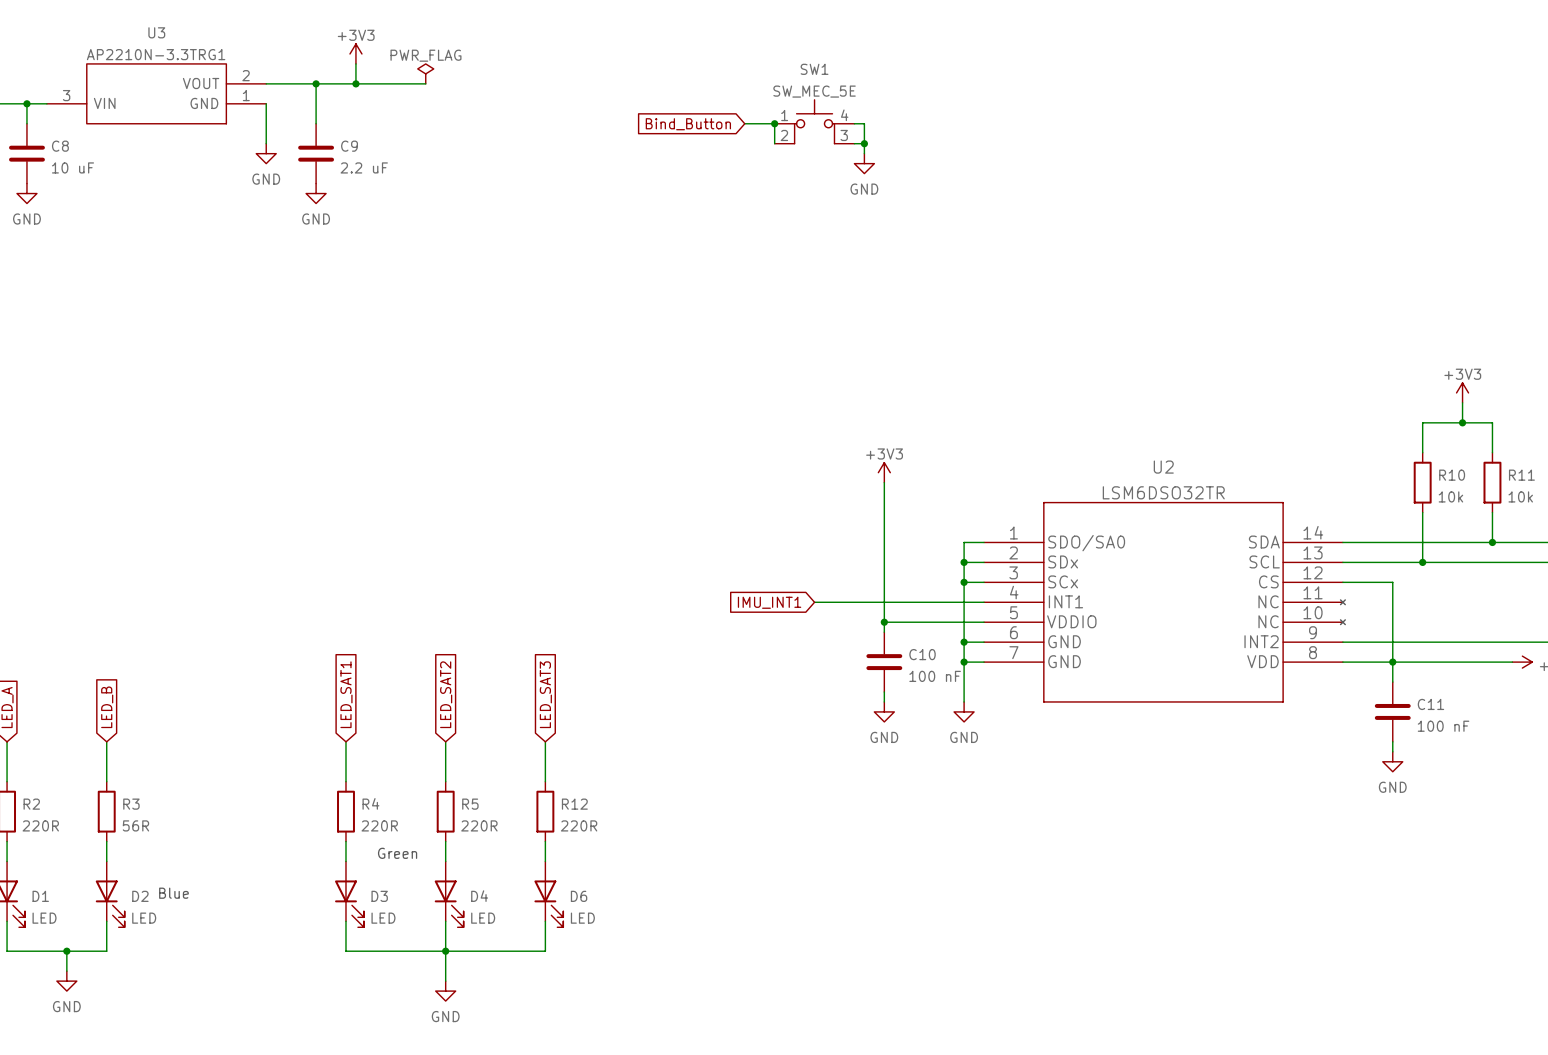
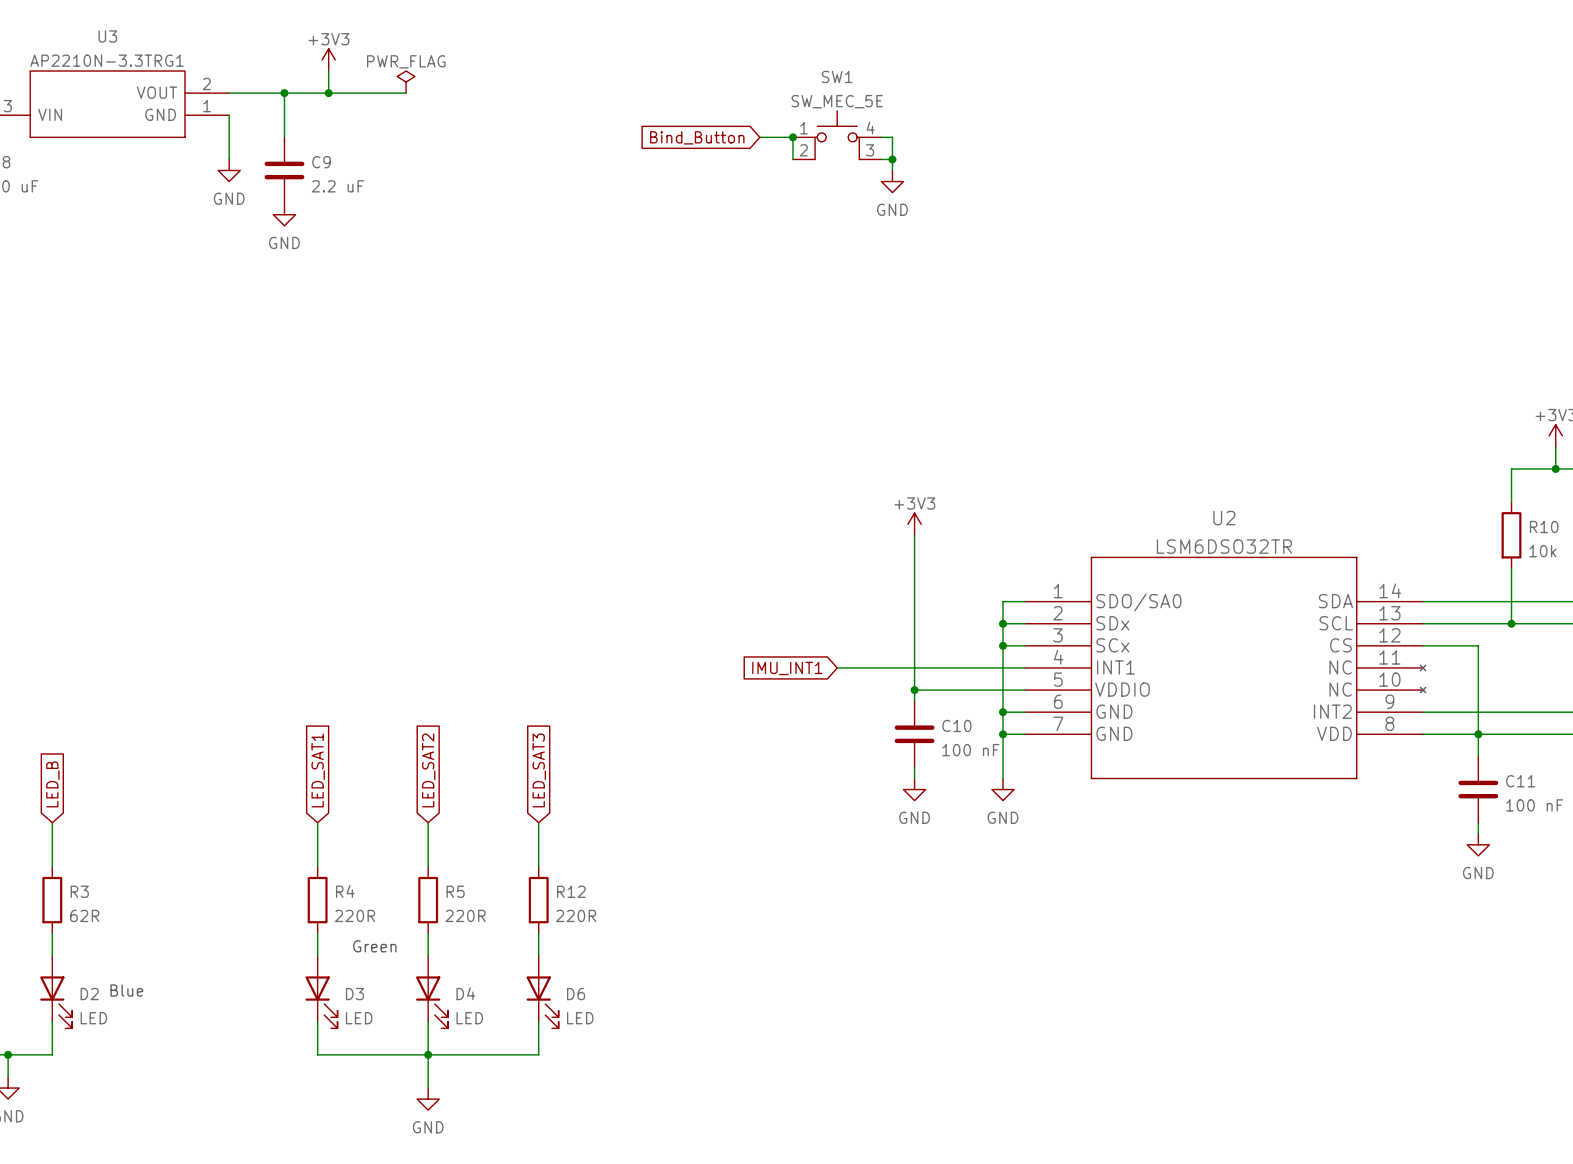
R3 value: 56R (135, 825) -> 62R (84, 915)

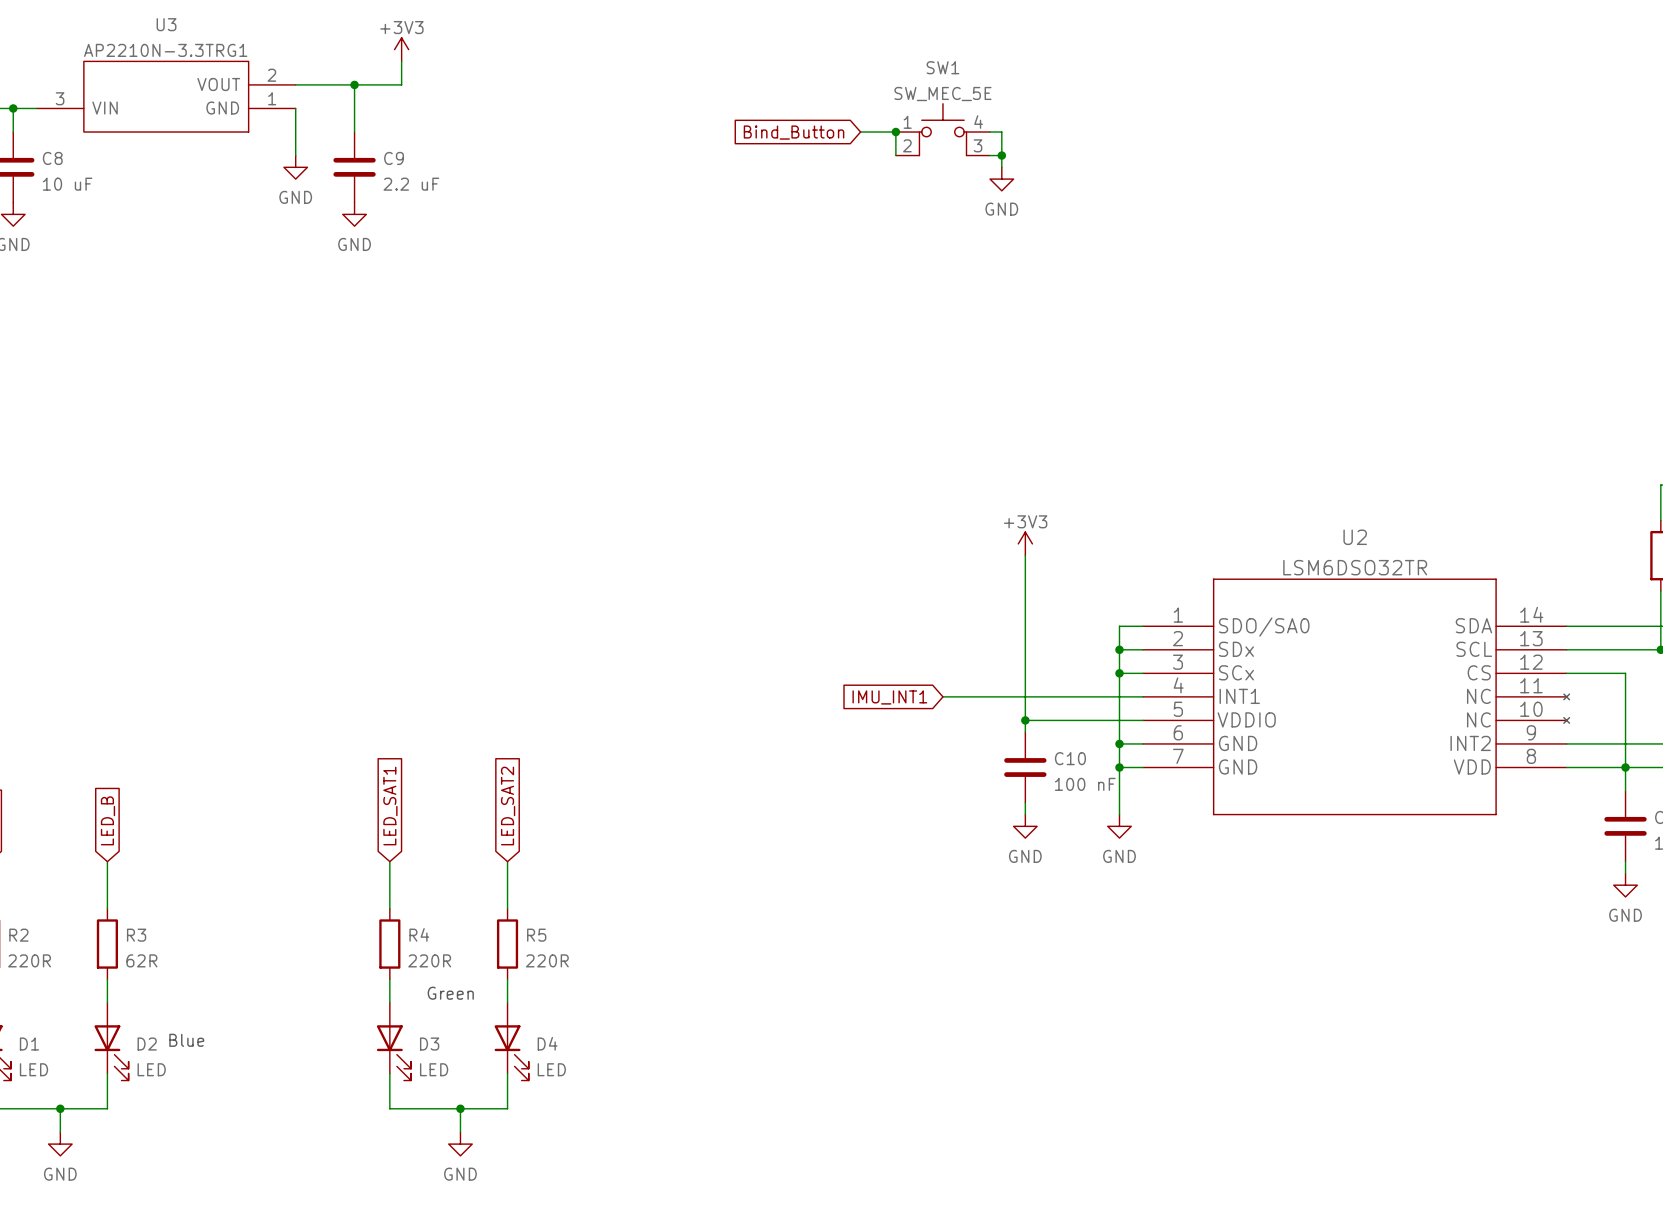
power symbol: PWR_FLAG (406, 82) -> none
wire: (328, 93) (406, 93) -> none
junction: (328, 93) -> none
global label: LED_SAT3 (539, 770) -> none
wire: (538, 822) (538, 866) -> none
R12: 220R (538, 900) -> none
wire: (538, 933) (538, 955) -> (460, 1108) (460, 1132)
D6: LED (542, 991) -> none
wire: (538, 1021) (538, 1054) (428, 1054) (428, 1088) -> none
junction position: (428, 1054) -> (460, 1108)
power symbol position: GND (428, 1099) -> GND (460, 1144)

